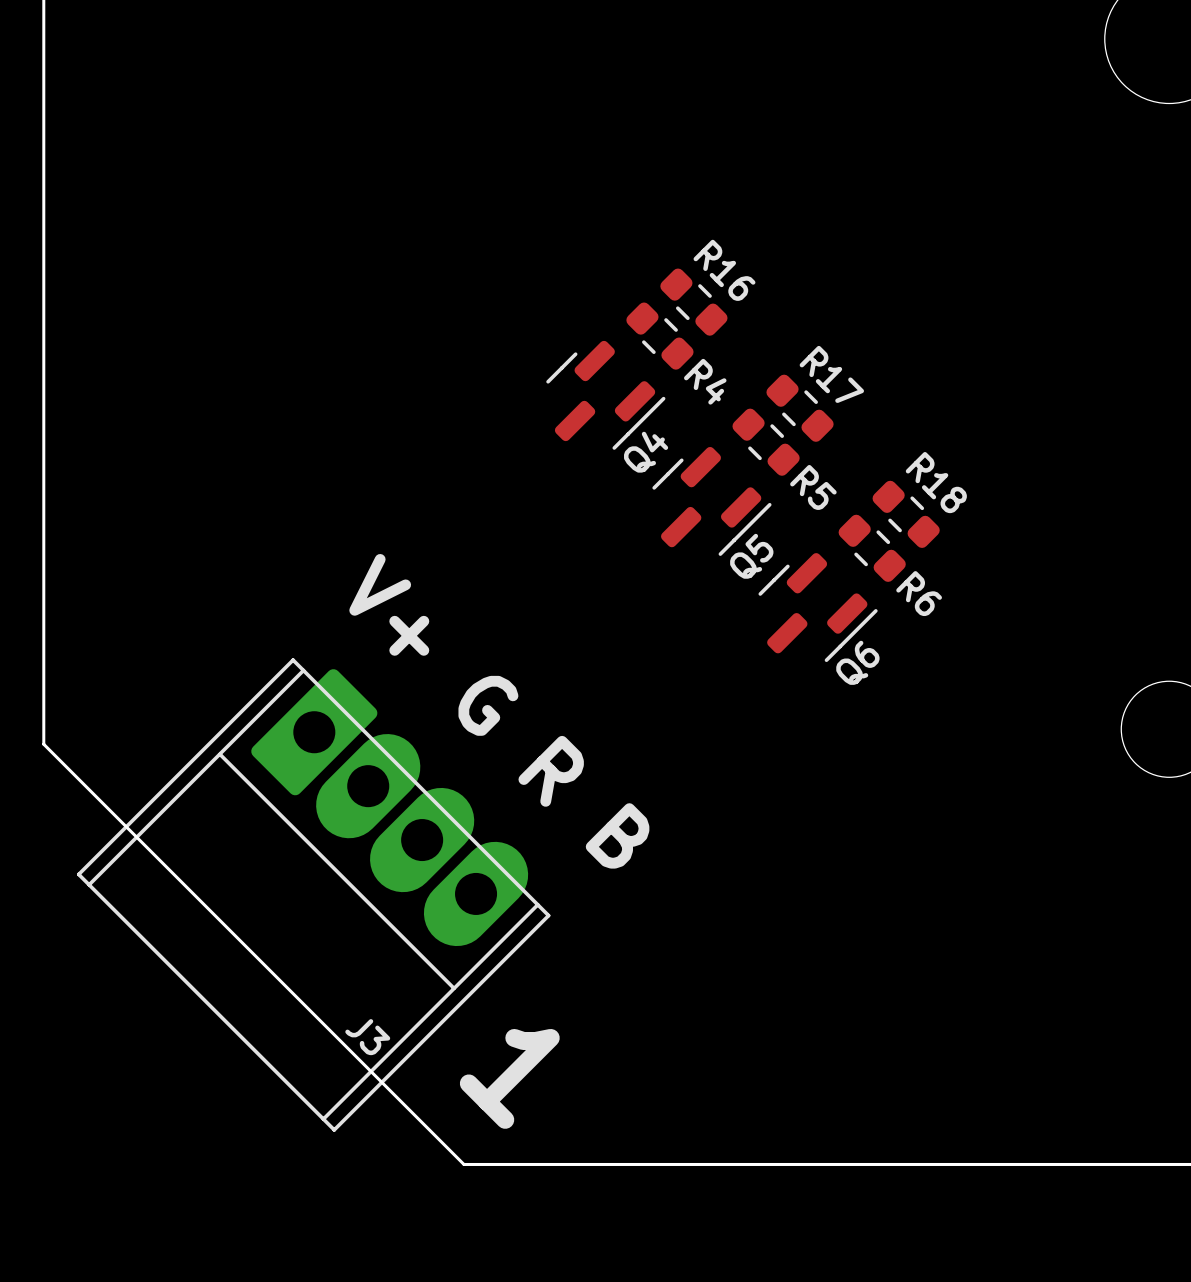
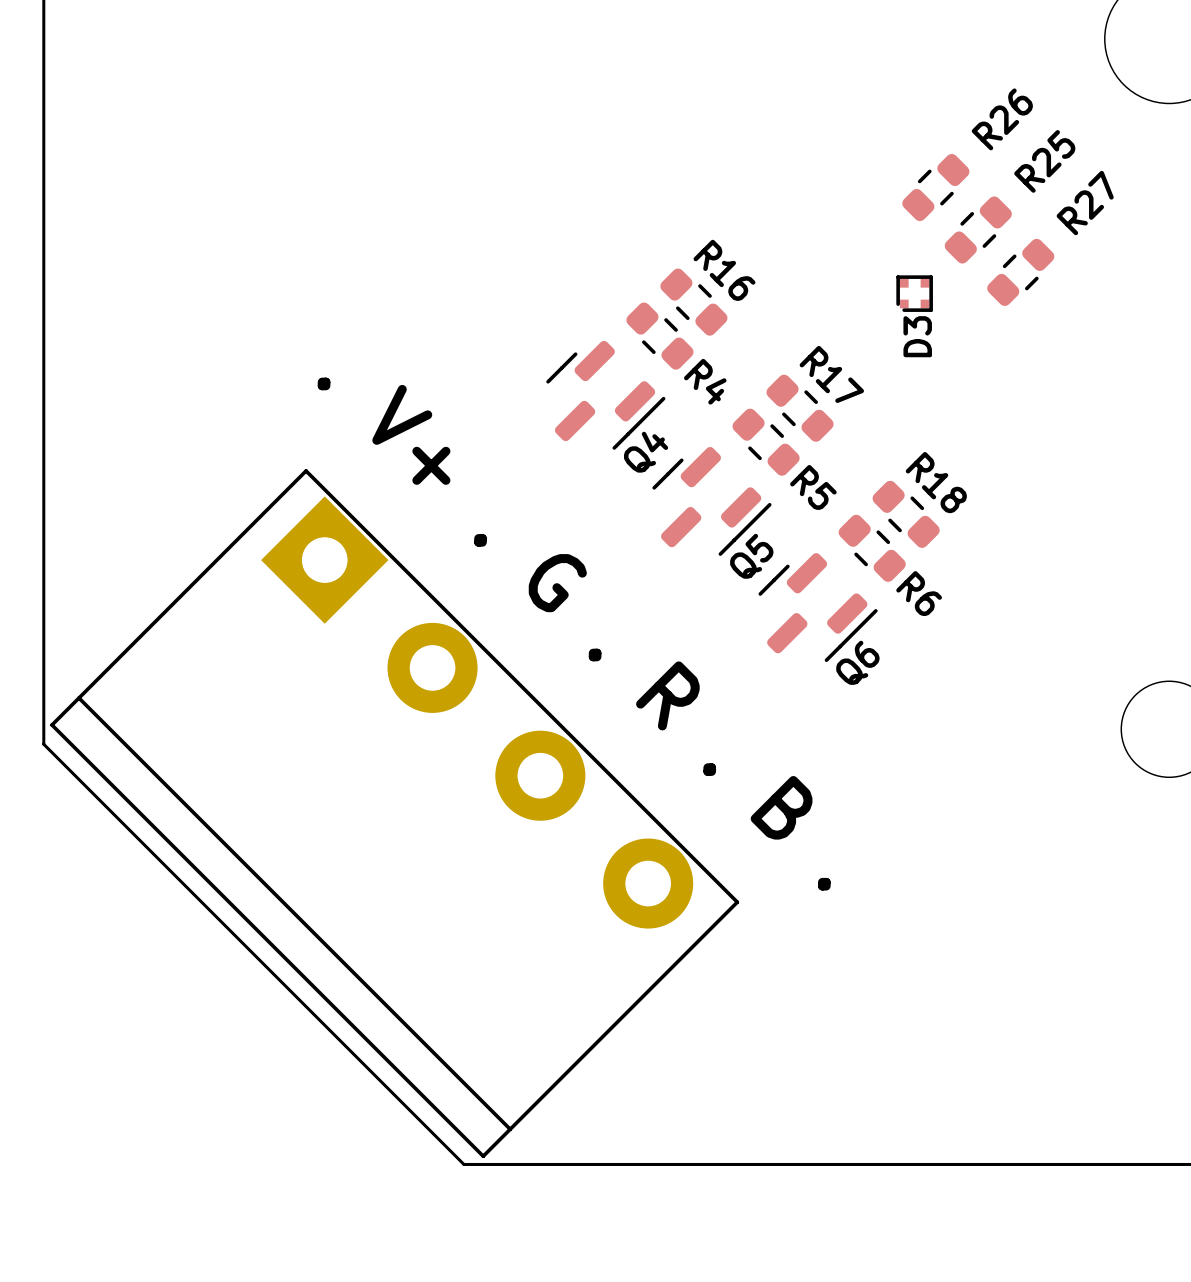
R26: none -> (935, 187)
R25: none -> (978, 229)
R27: none -> (1020, 272)
D3: none -> (912, 295)
text: V+ G R B (499, 711) -> . V+ . G . R . B . (574, 634)
part: none -> (394, 813)
J3: (313, 895) -> none
text: 1 (509, 1078) -> none

